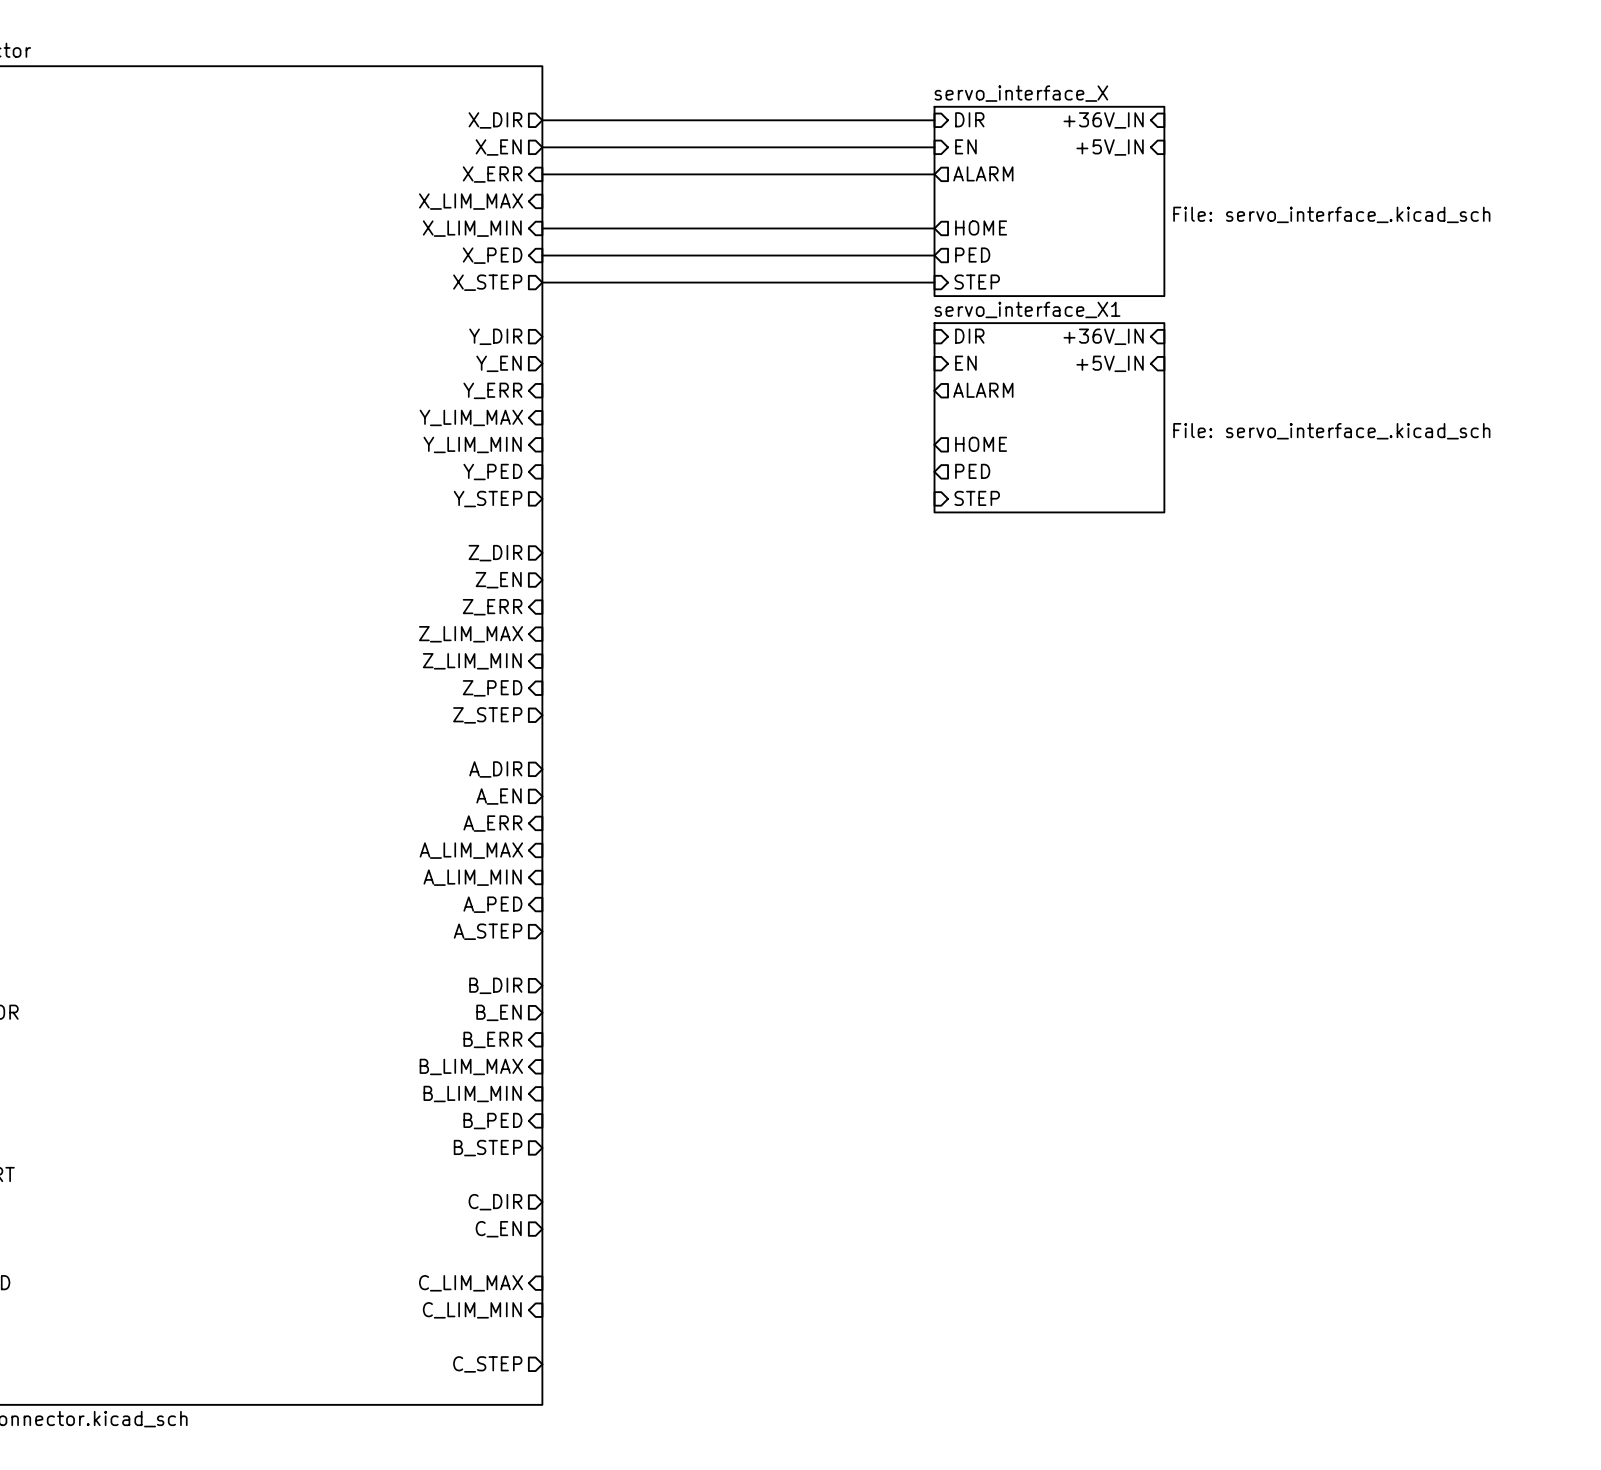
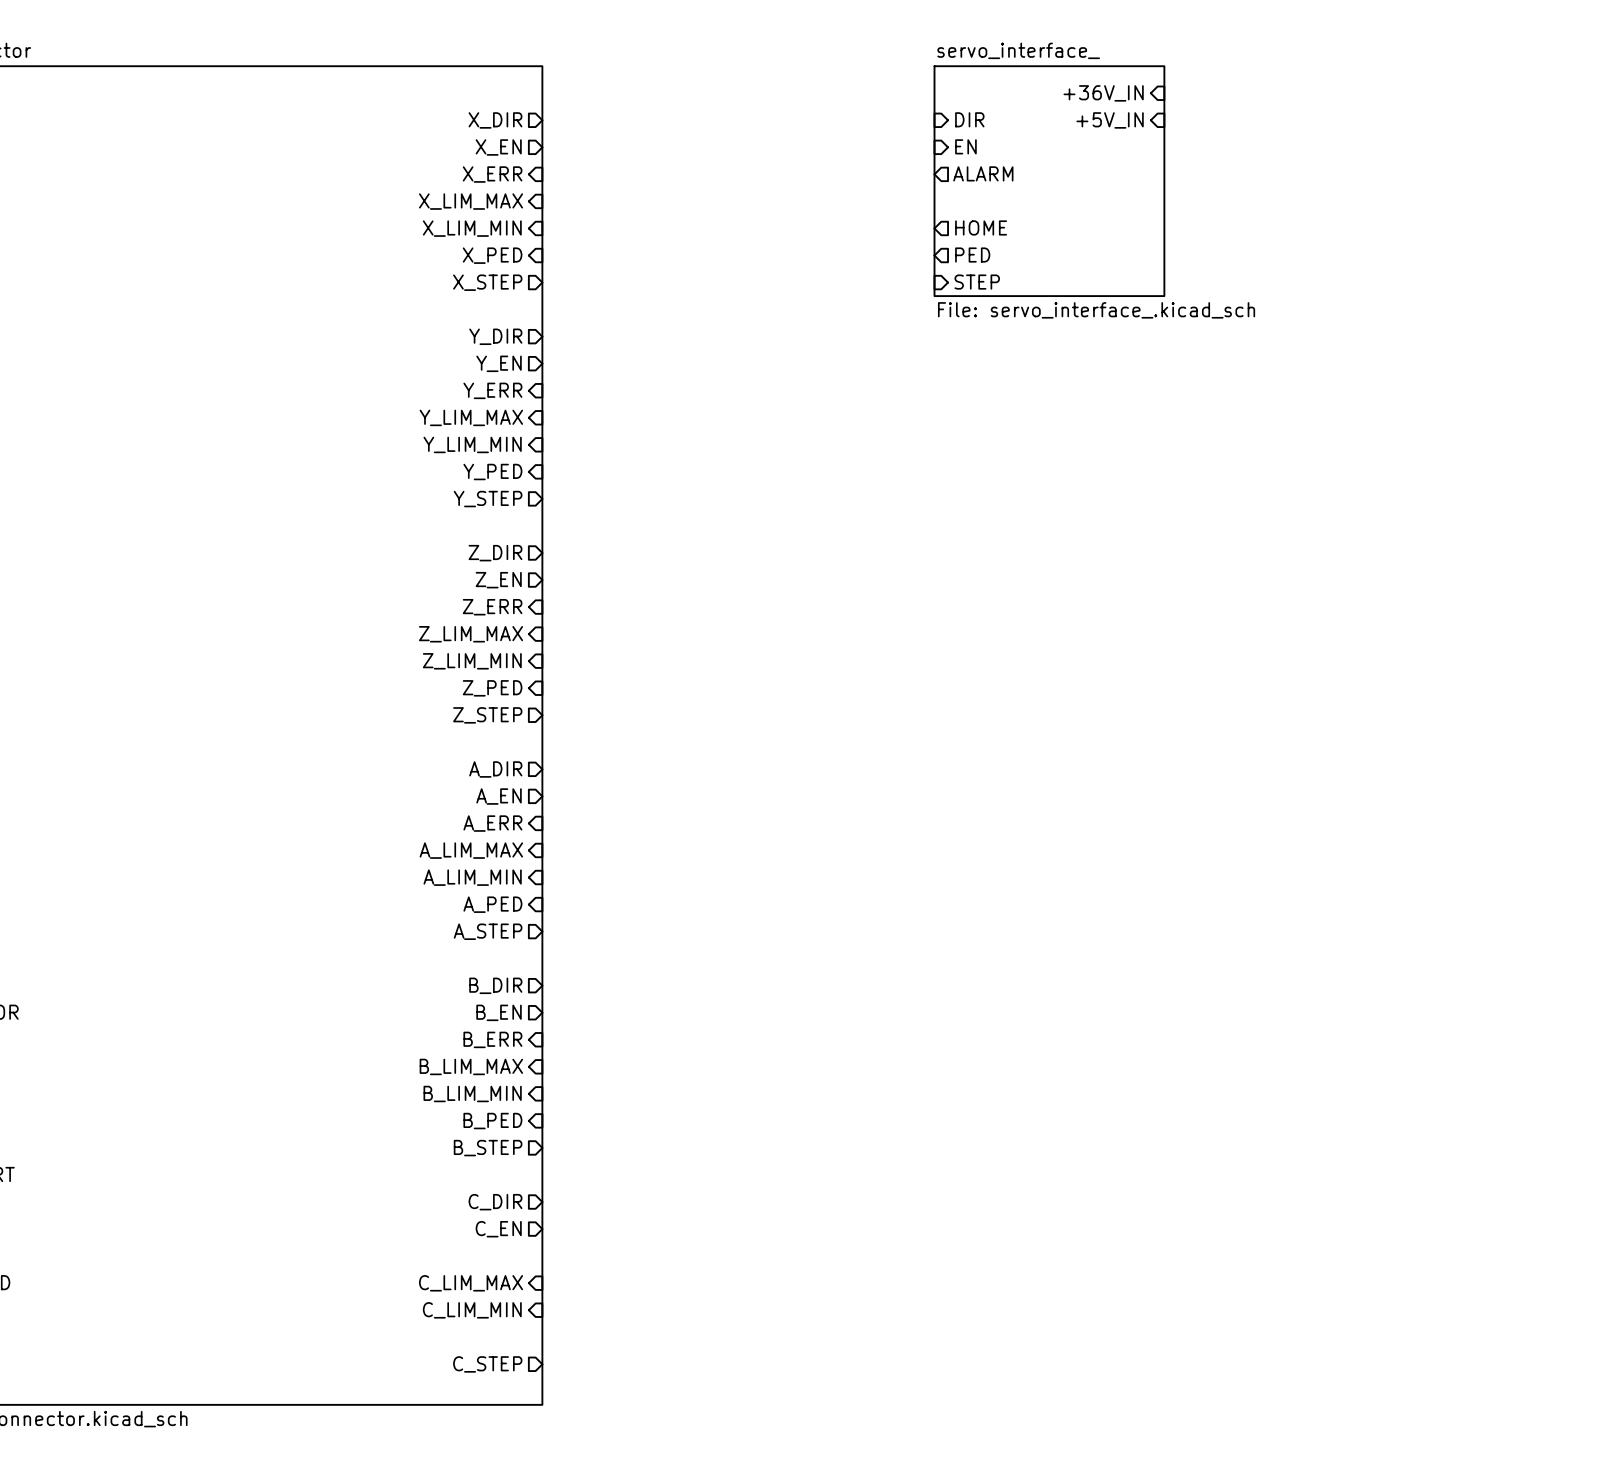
wire: (542, 120) (934, 120) -> none
sheet pin: +36V_IN (1103, 120) -> +5V_IN (1110, 120)
wire: (542, 147) (934, 147) -> none
sheet pin: +5V_IN (1110, 147) -> none
wire: (542, 174) (934, 174) -> none
sheet servo_interface_: none -> File: servo_interface_.kicad_sch (1049, 181)
sheet servo_interface_X: File: servo_interface_.kicad_sch (1049, 201) -> none
wire: (542, 228) (934, 228) -> none
wire: (542, 255) (934, 255) -> none
wire: (542, 282) (934, 282) -> none
sheet pin: DIR (969, 336) -> none
sheet pin position: +36V_IN (1103, 336) -> +36V_IN (1103, 93)
sheet pin: EN (965, 363) -> none
sheet pin: +5V_IN (1110, 363) -> none
sheet pin: ALARM (983, 390) -> none
sheet servo_interface_X1: File: servo_interface_.kicad_sch (1049, 417) -> none
sheet pin: HOME (981, 444) -> none
sheet pin: PED (972, 471) -> none
sheet pin: STEP (977, 498) -> none

